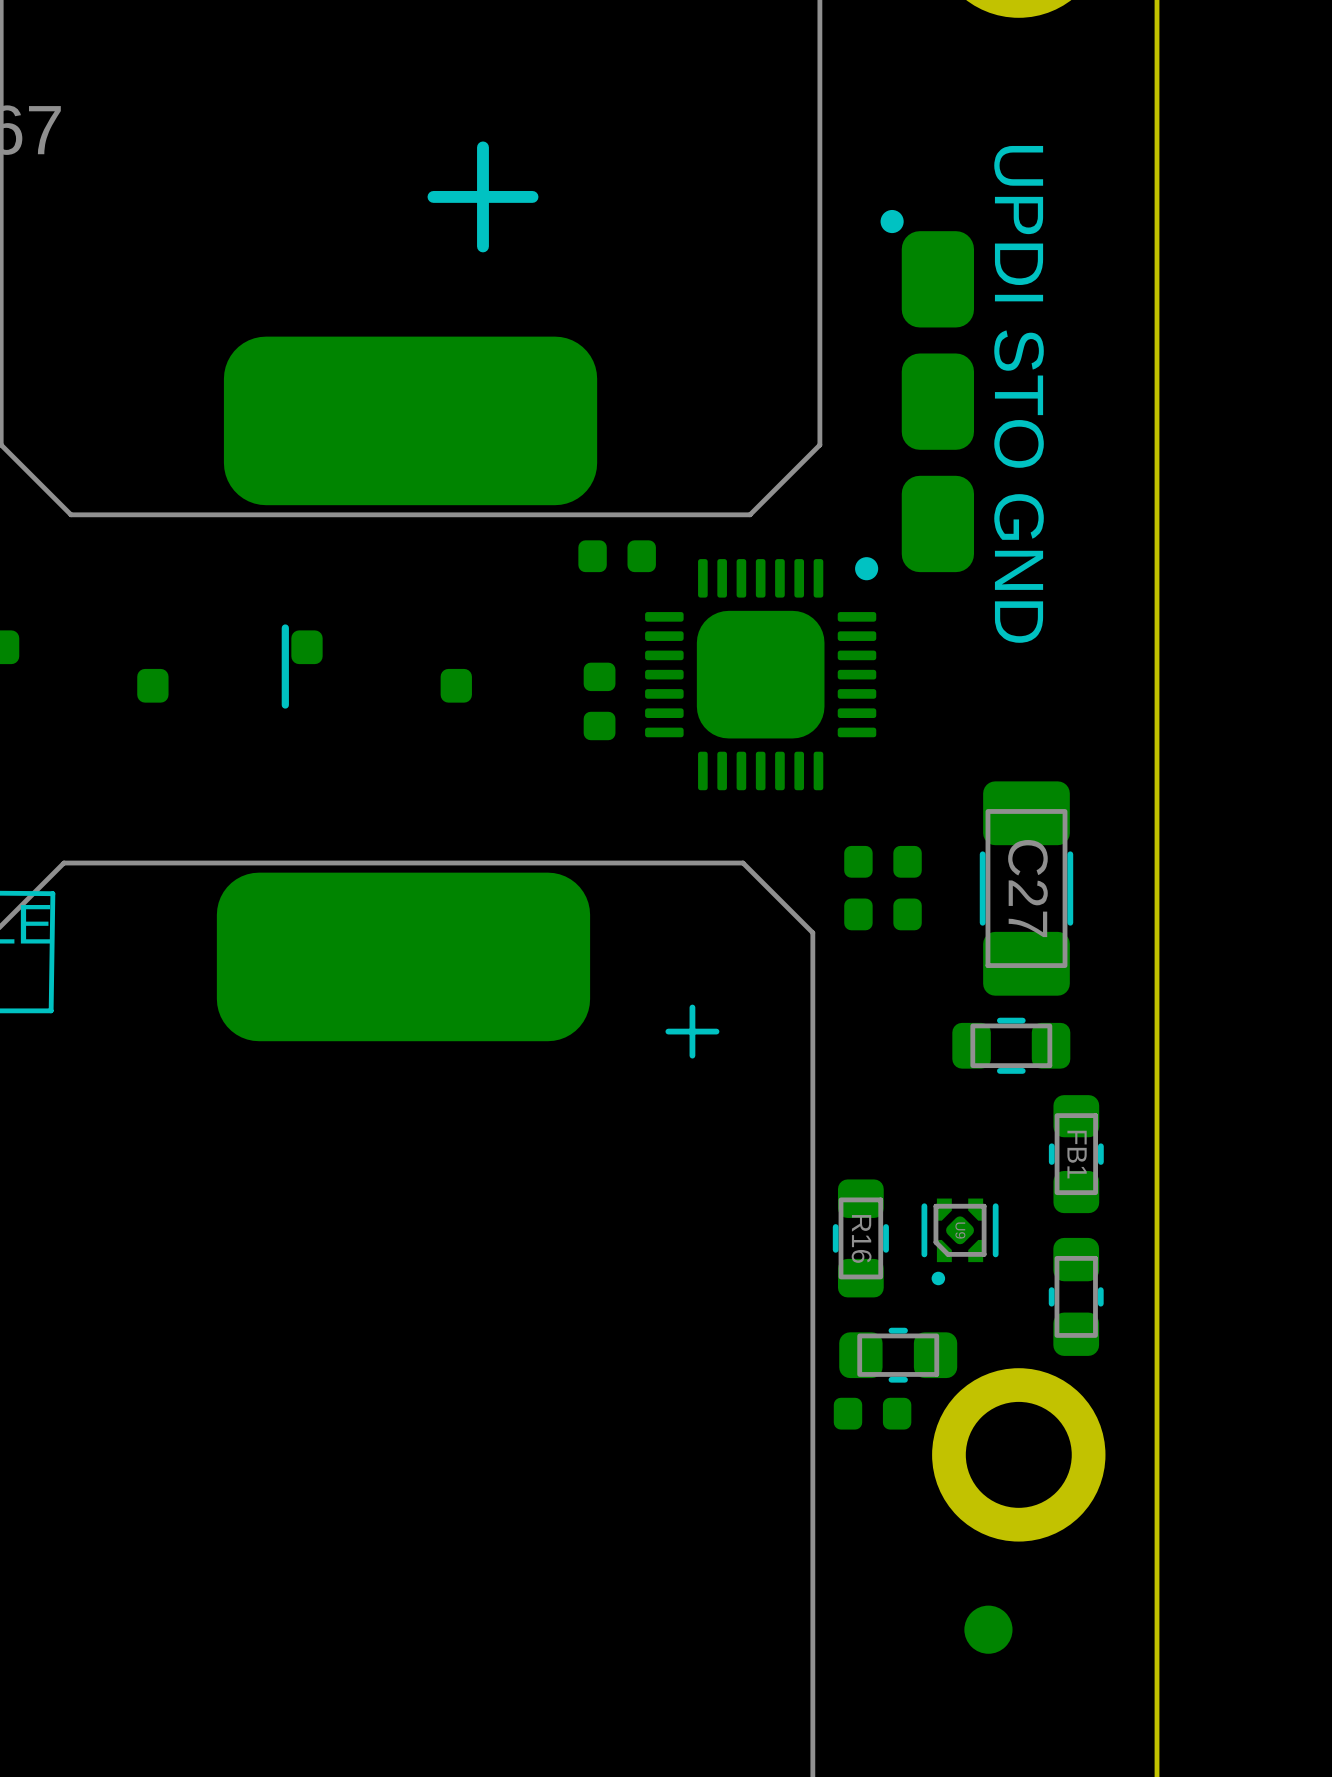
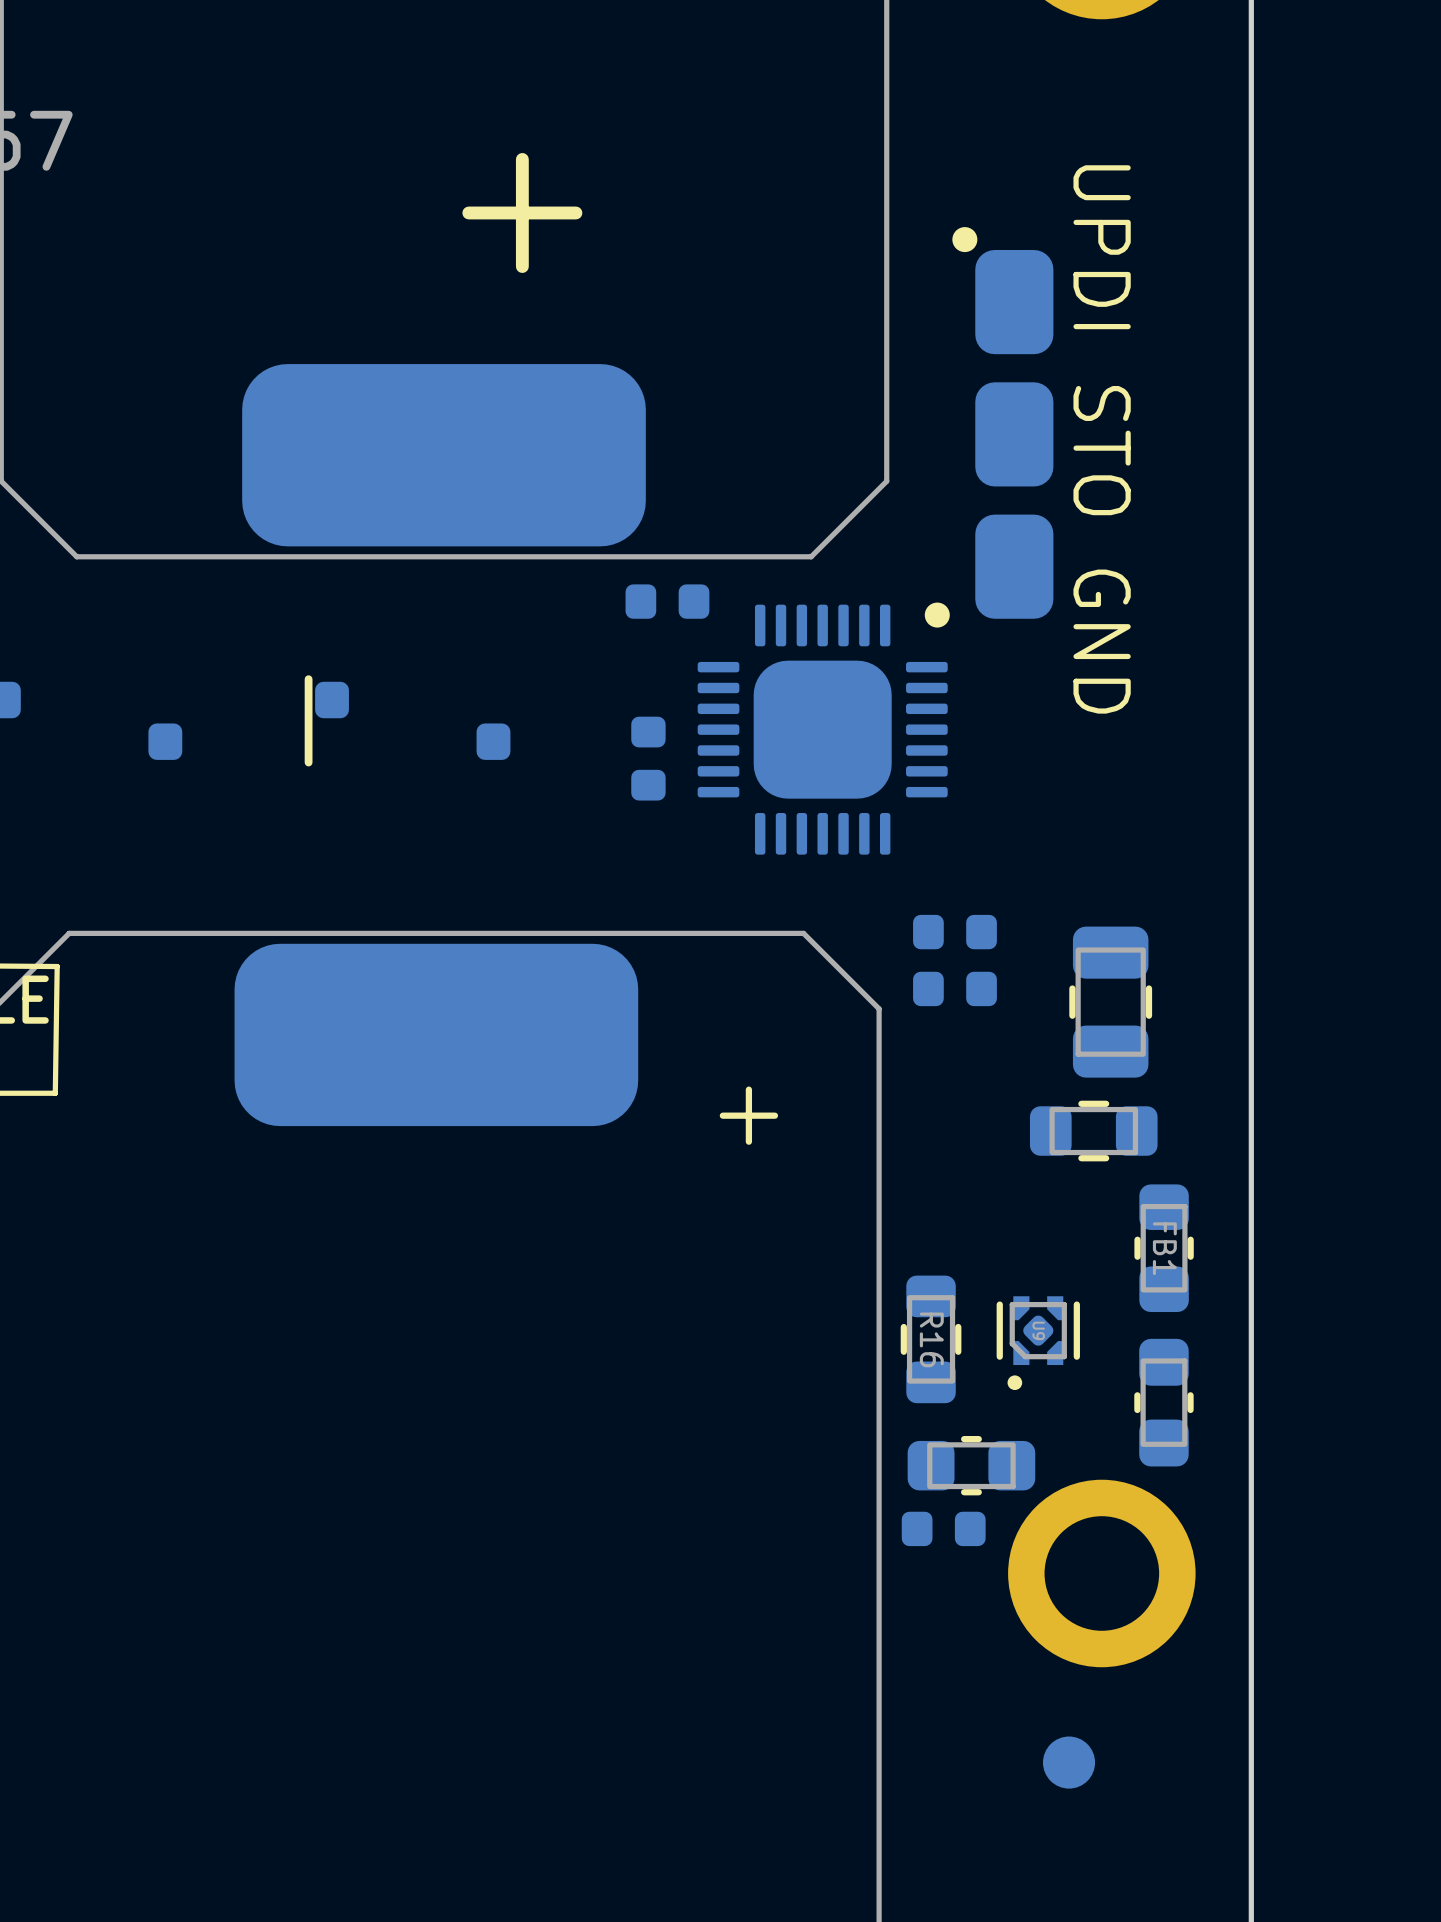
C27: (1026, 888) -> none
part: none -> (1110, 1002)

